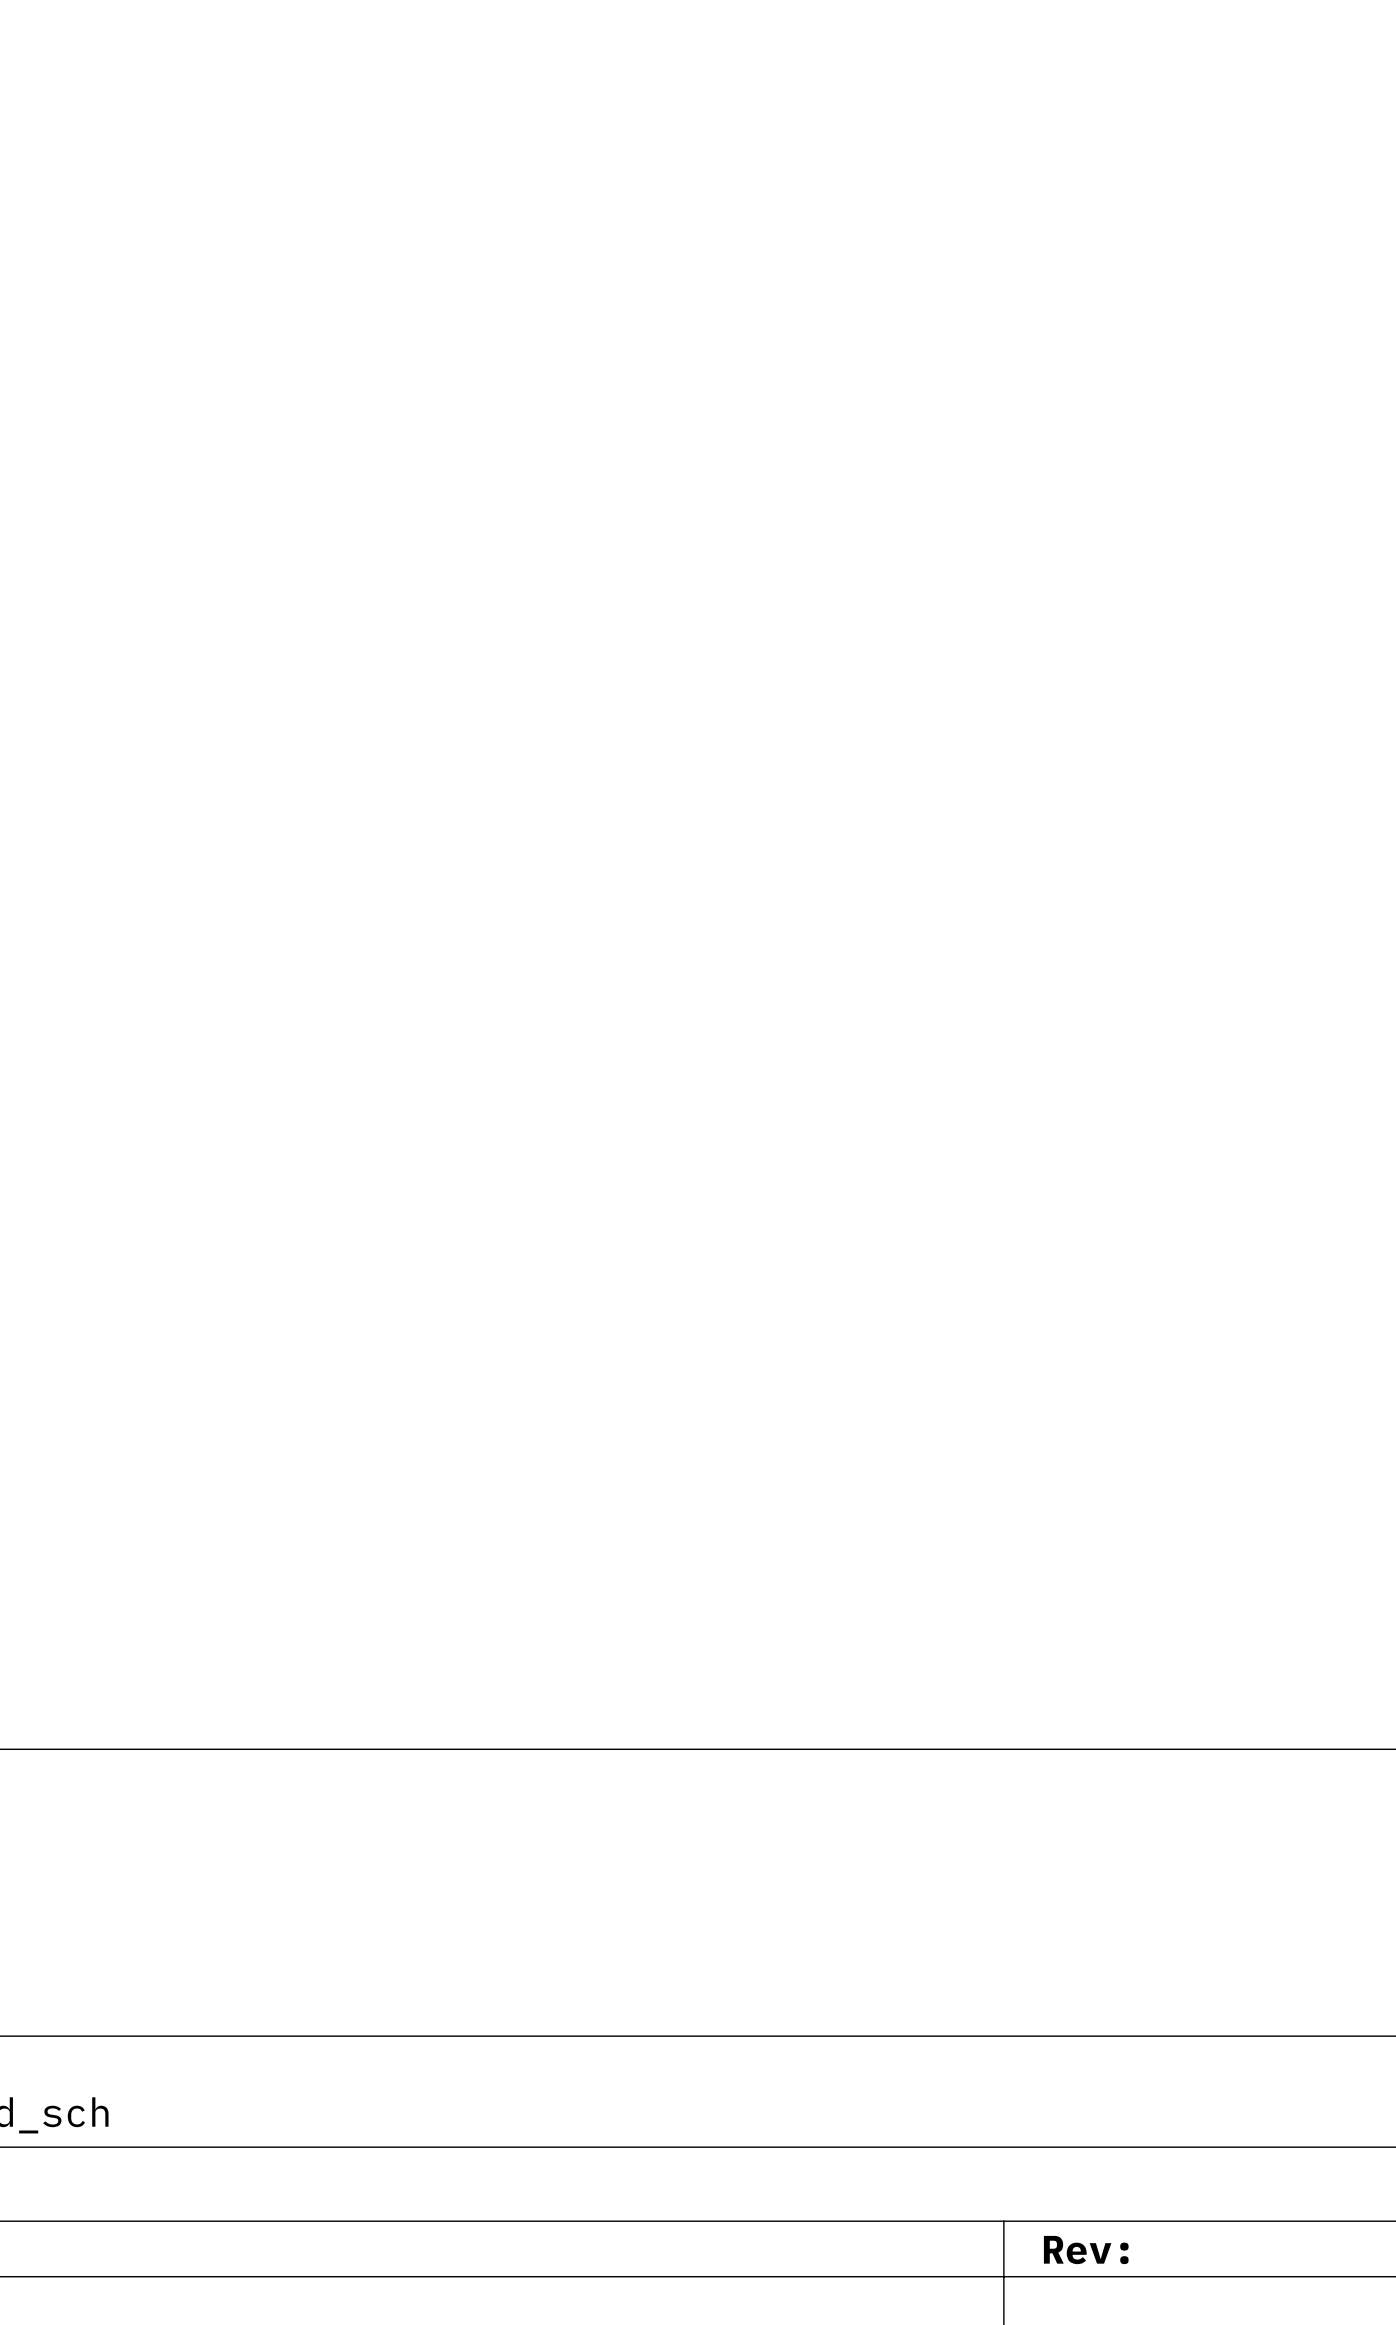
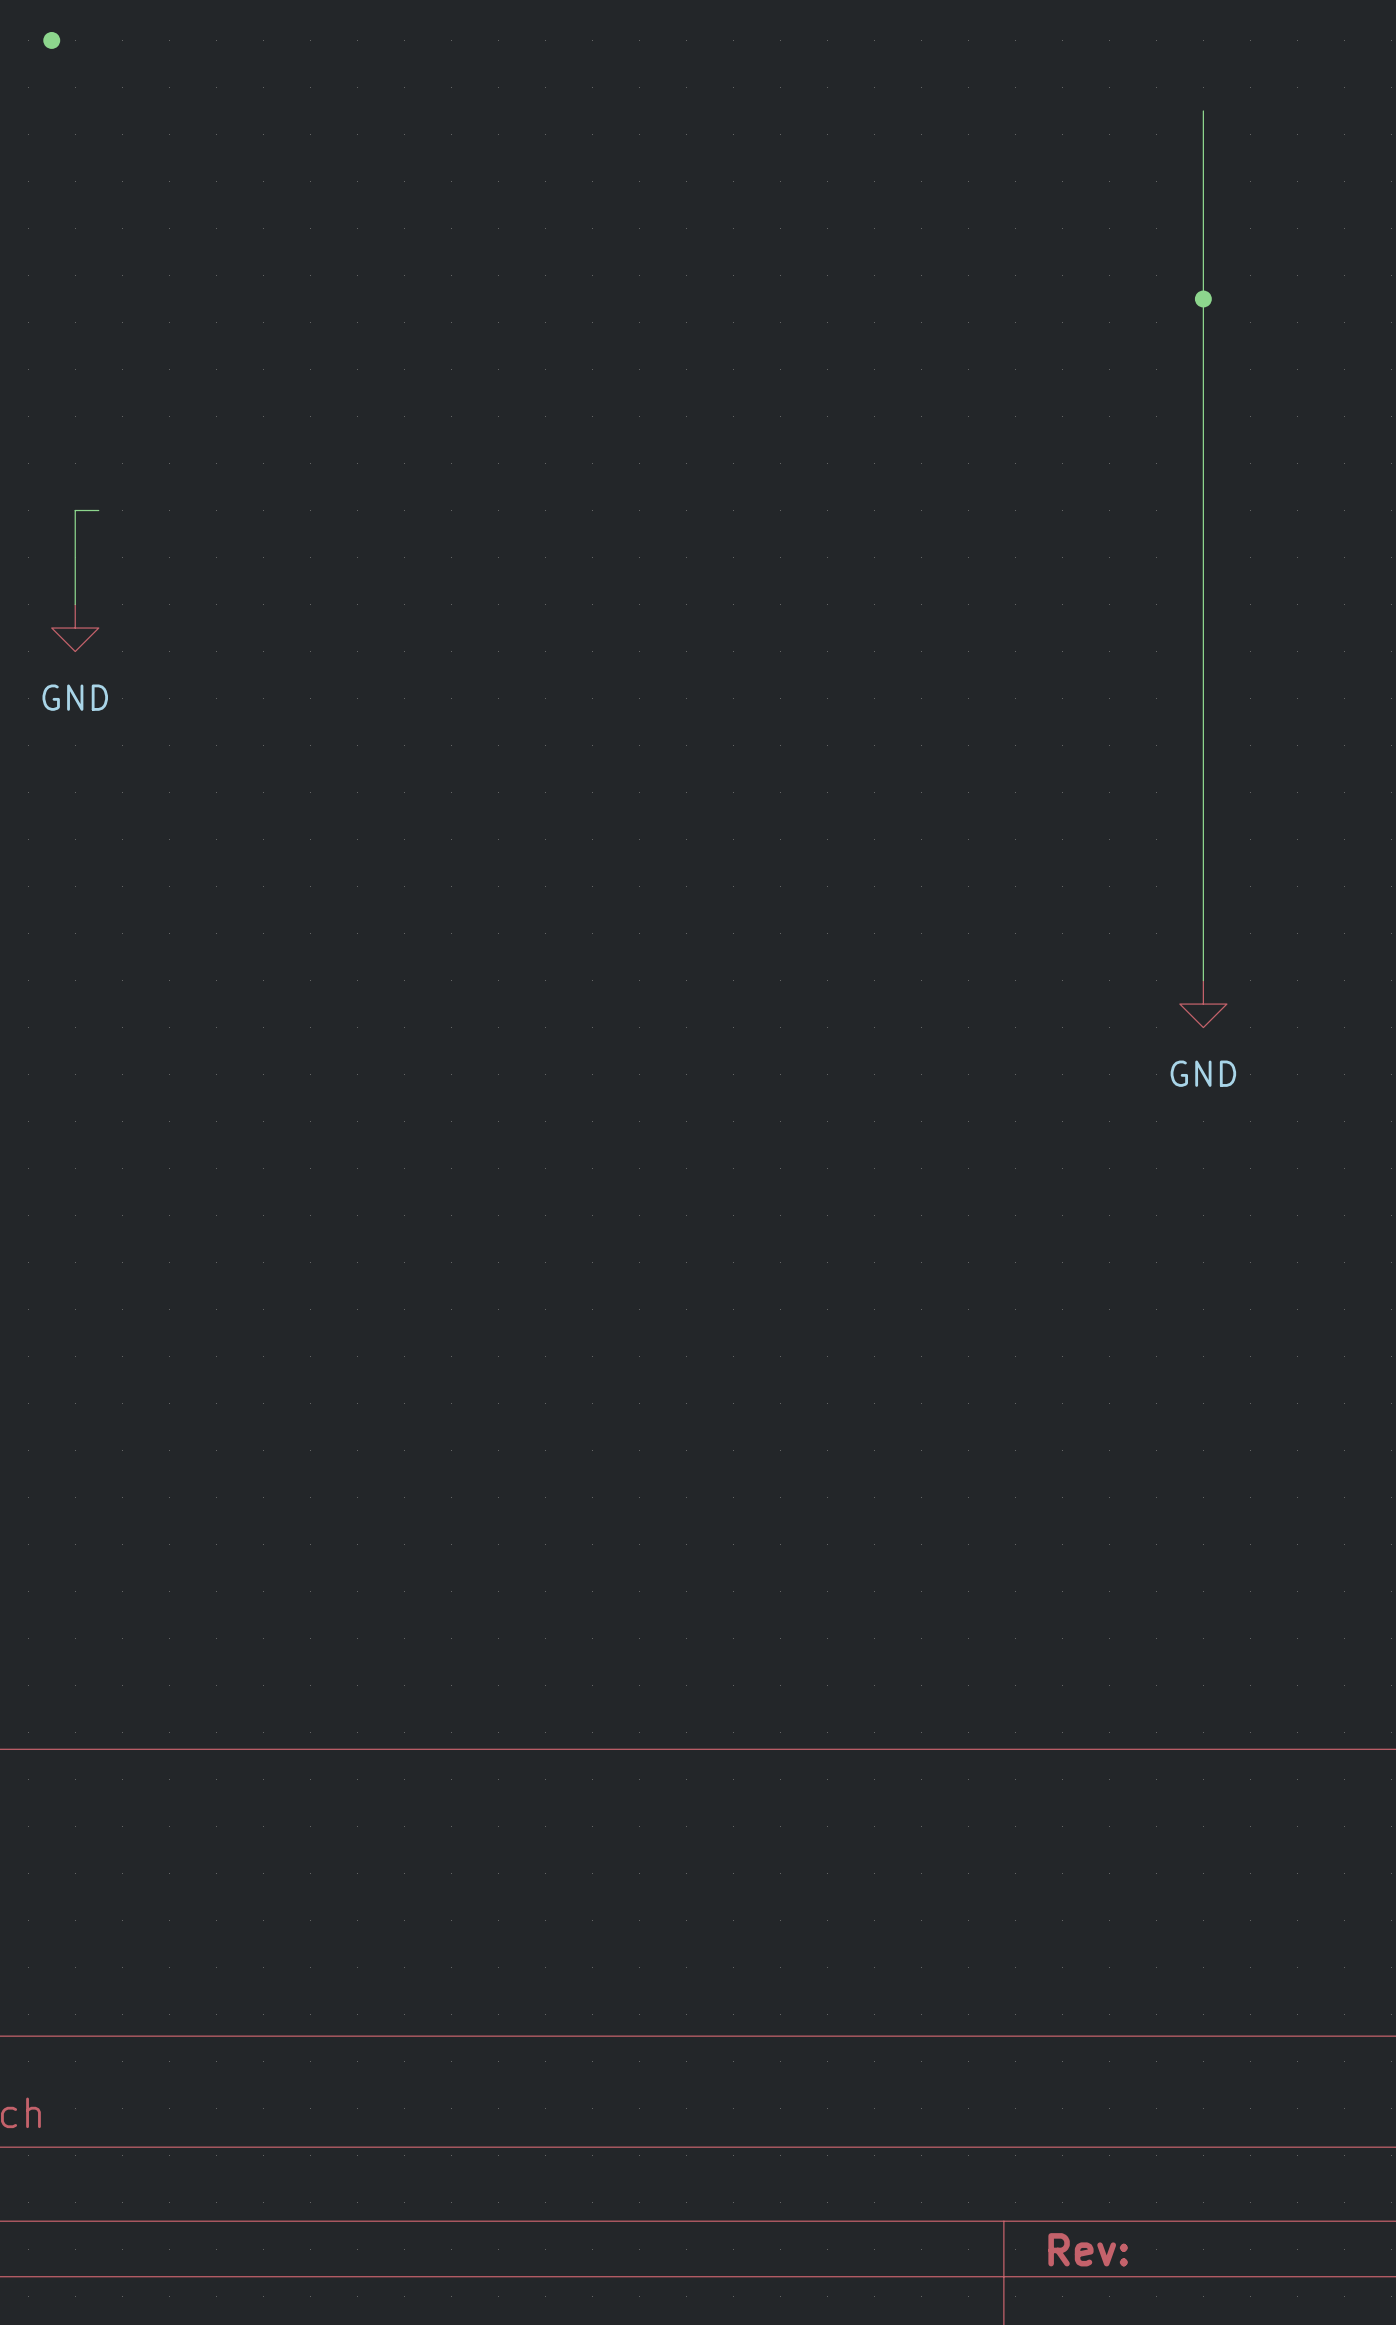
junction: none -> (51, 40)
wire: none -> (1203, 110) (1203, 980)
junction: none -> (1203, 298)
wire: none -> (98, 510) (75, 510) (75, 604)
power symbol: none -> GND (75, 628)
power symbol: none -> GND (1203, 1004)

